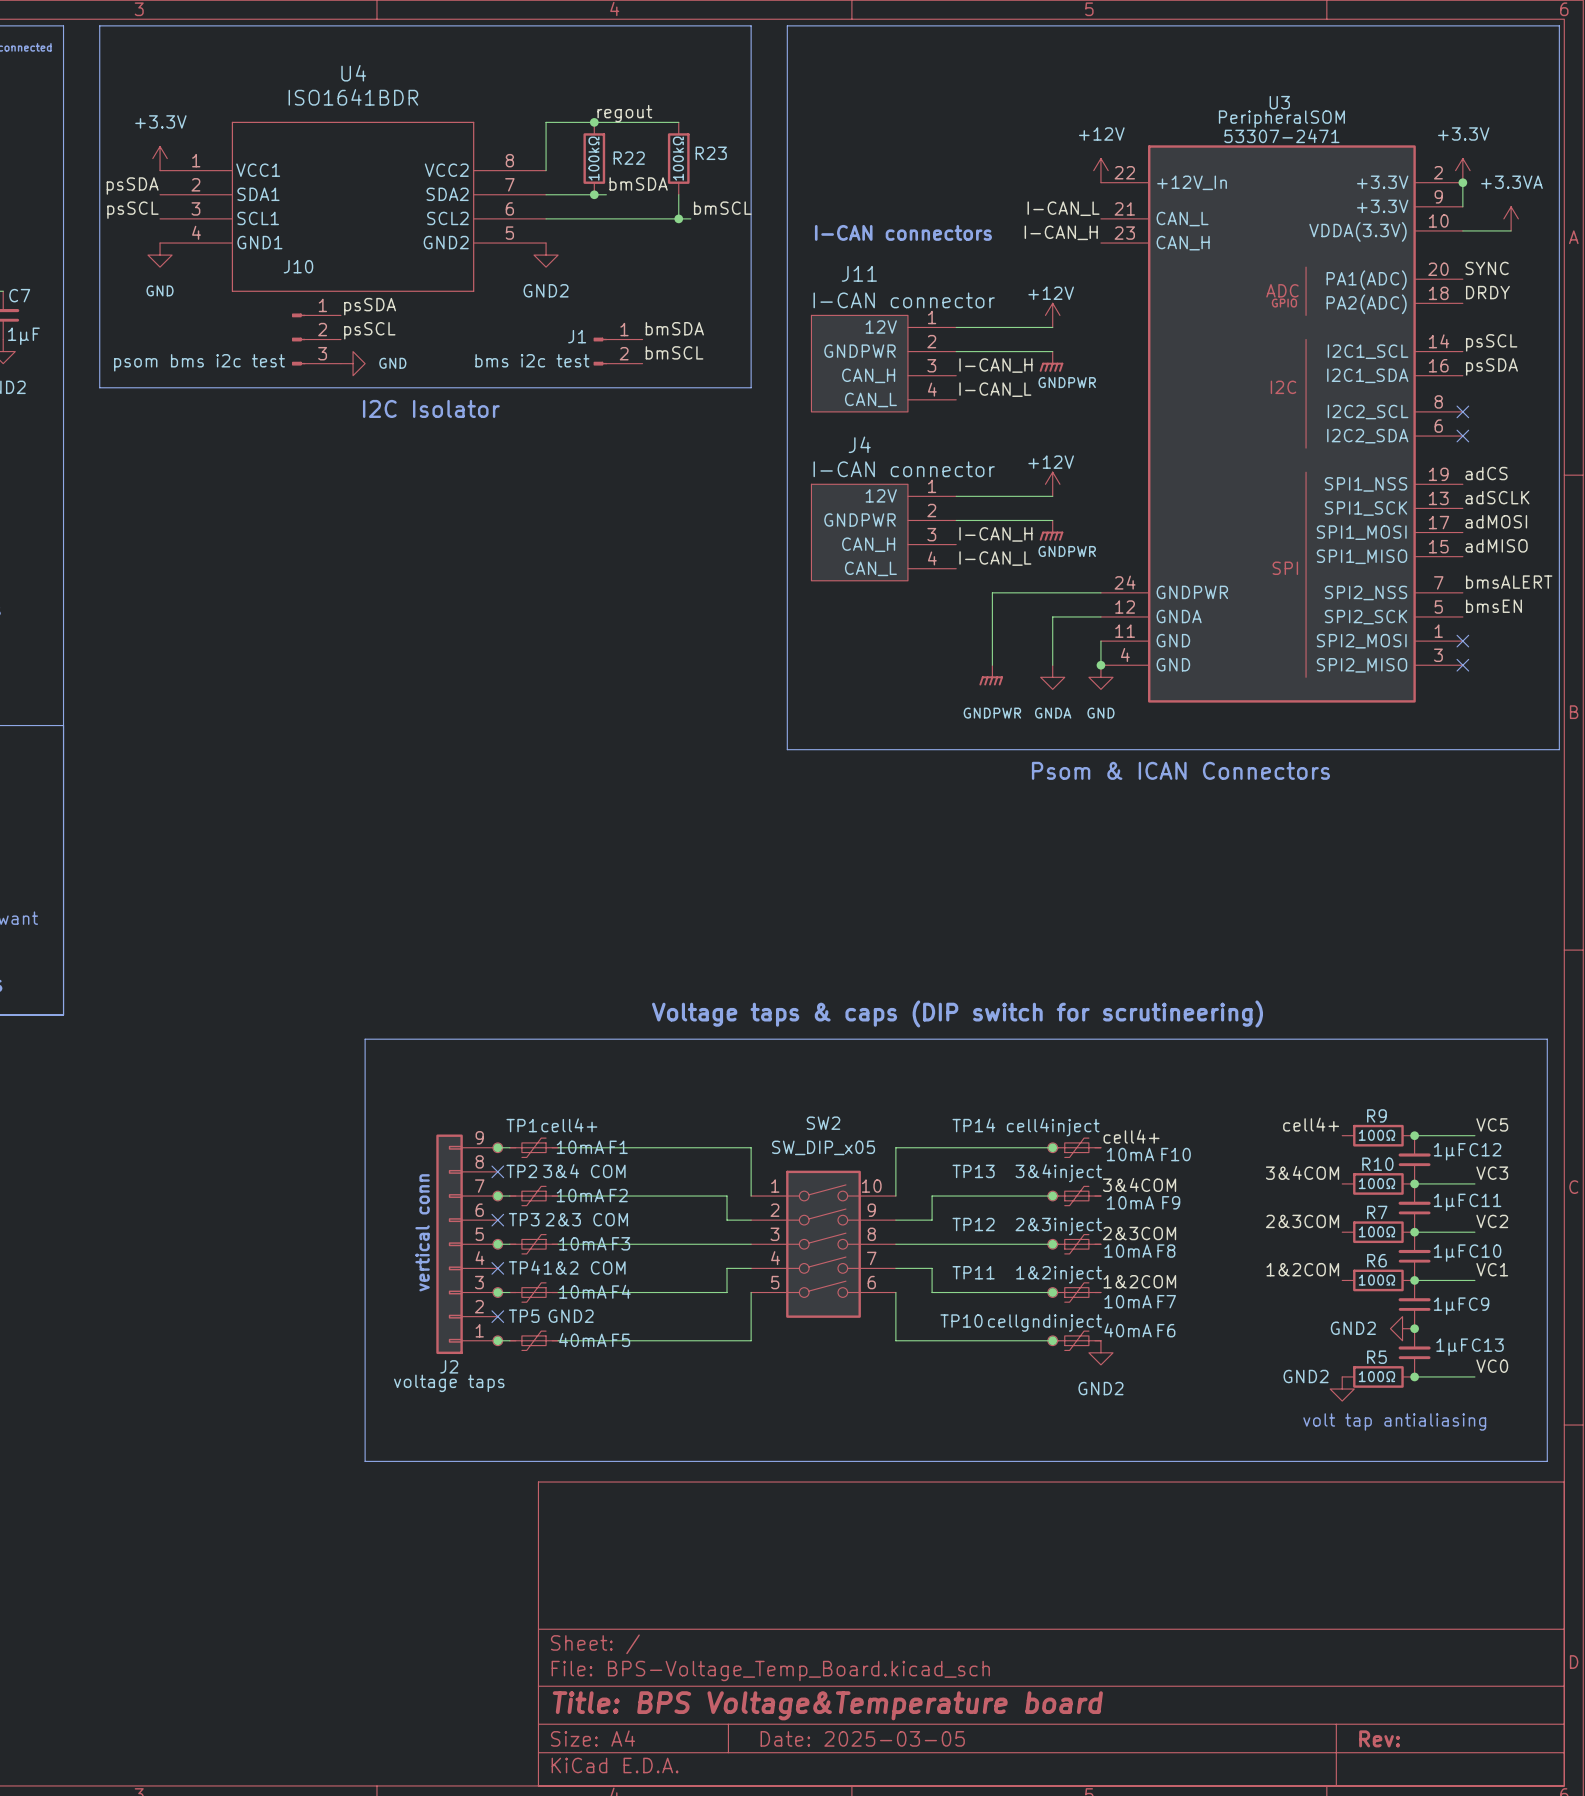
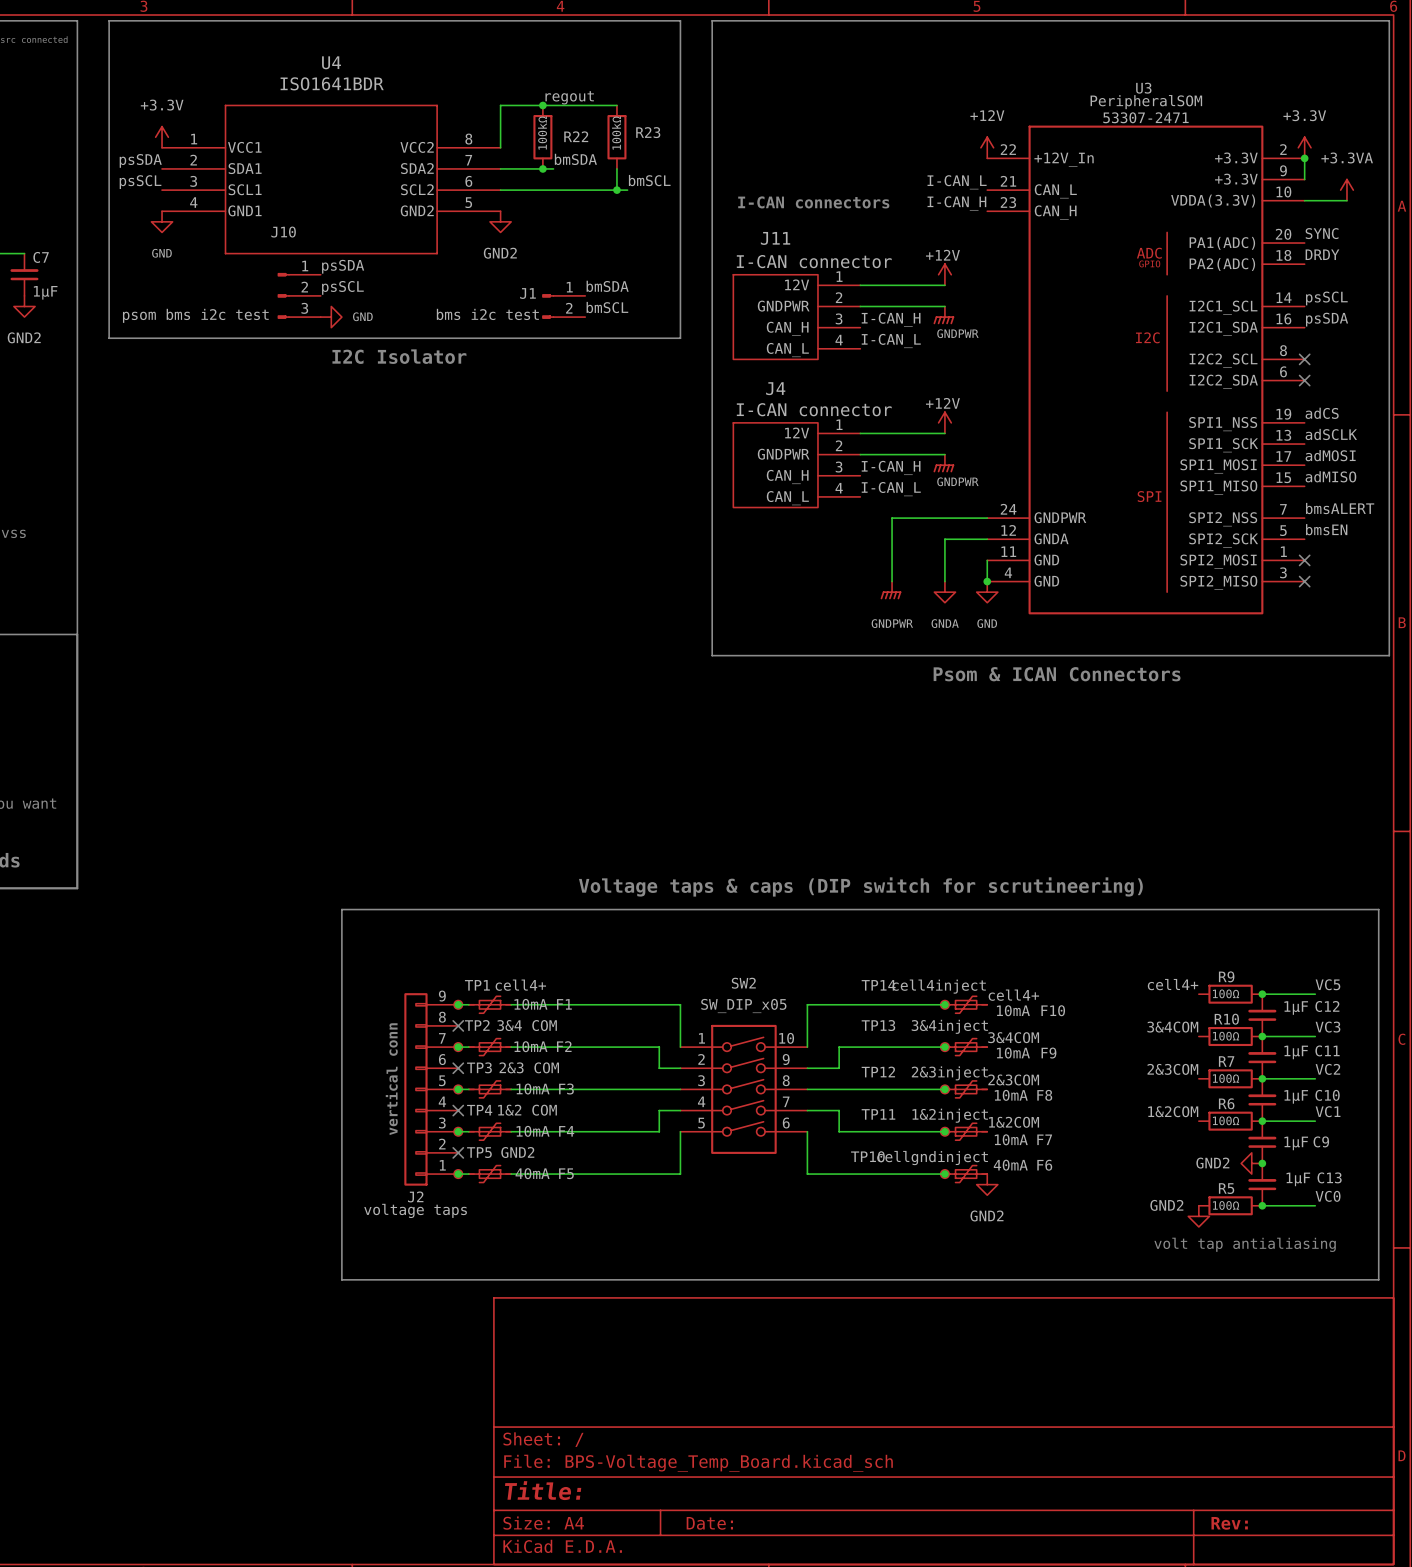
title block: Title: BPS Voltage&Temperature board (827, 1705) -> Title: (543, 1490)
title block: Date: 2025-03-05 (862, 1738) -> Date: (709, 1523)

